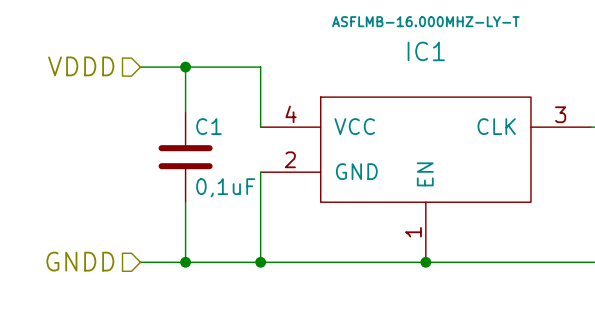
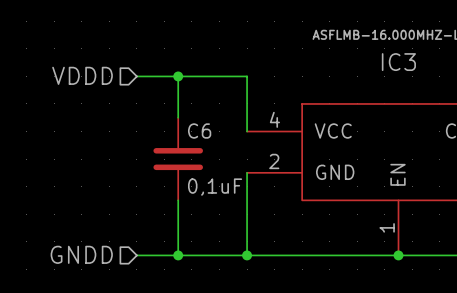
IC1 name: IC1 (426, 51) -> IC3 (398, 62)
C1 name: C1 (208, 126) -> C6 (199, 131)

